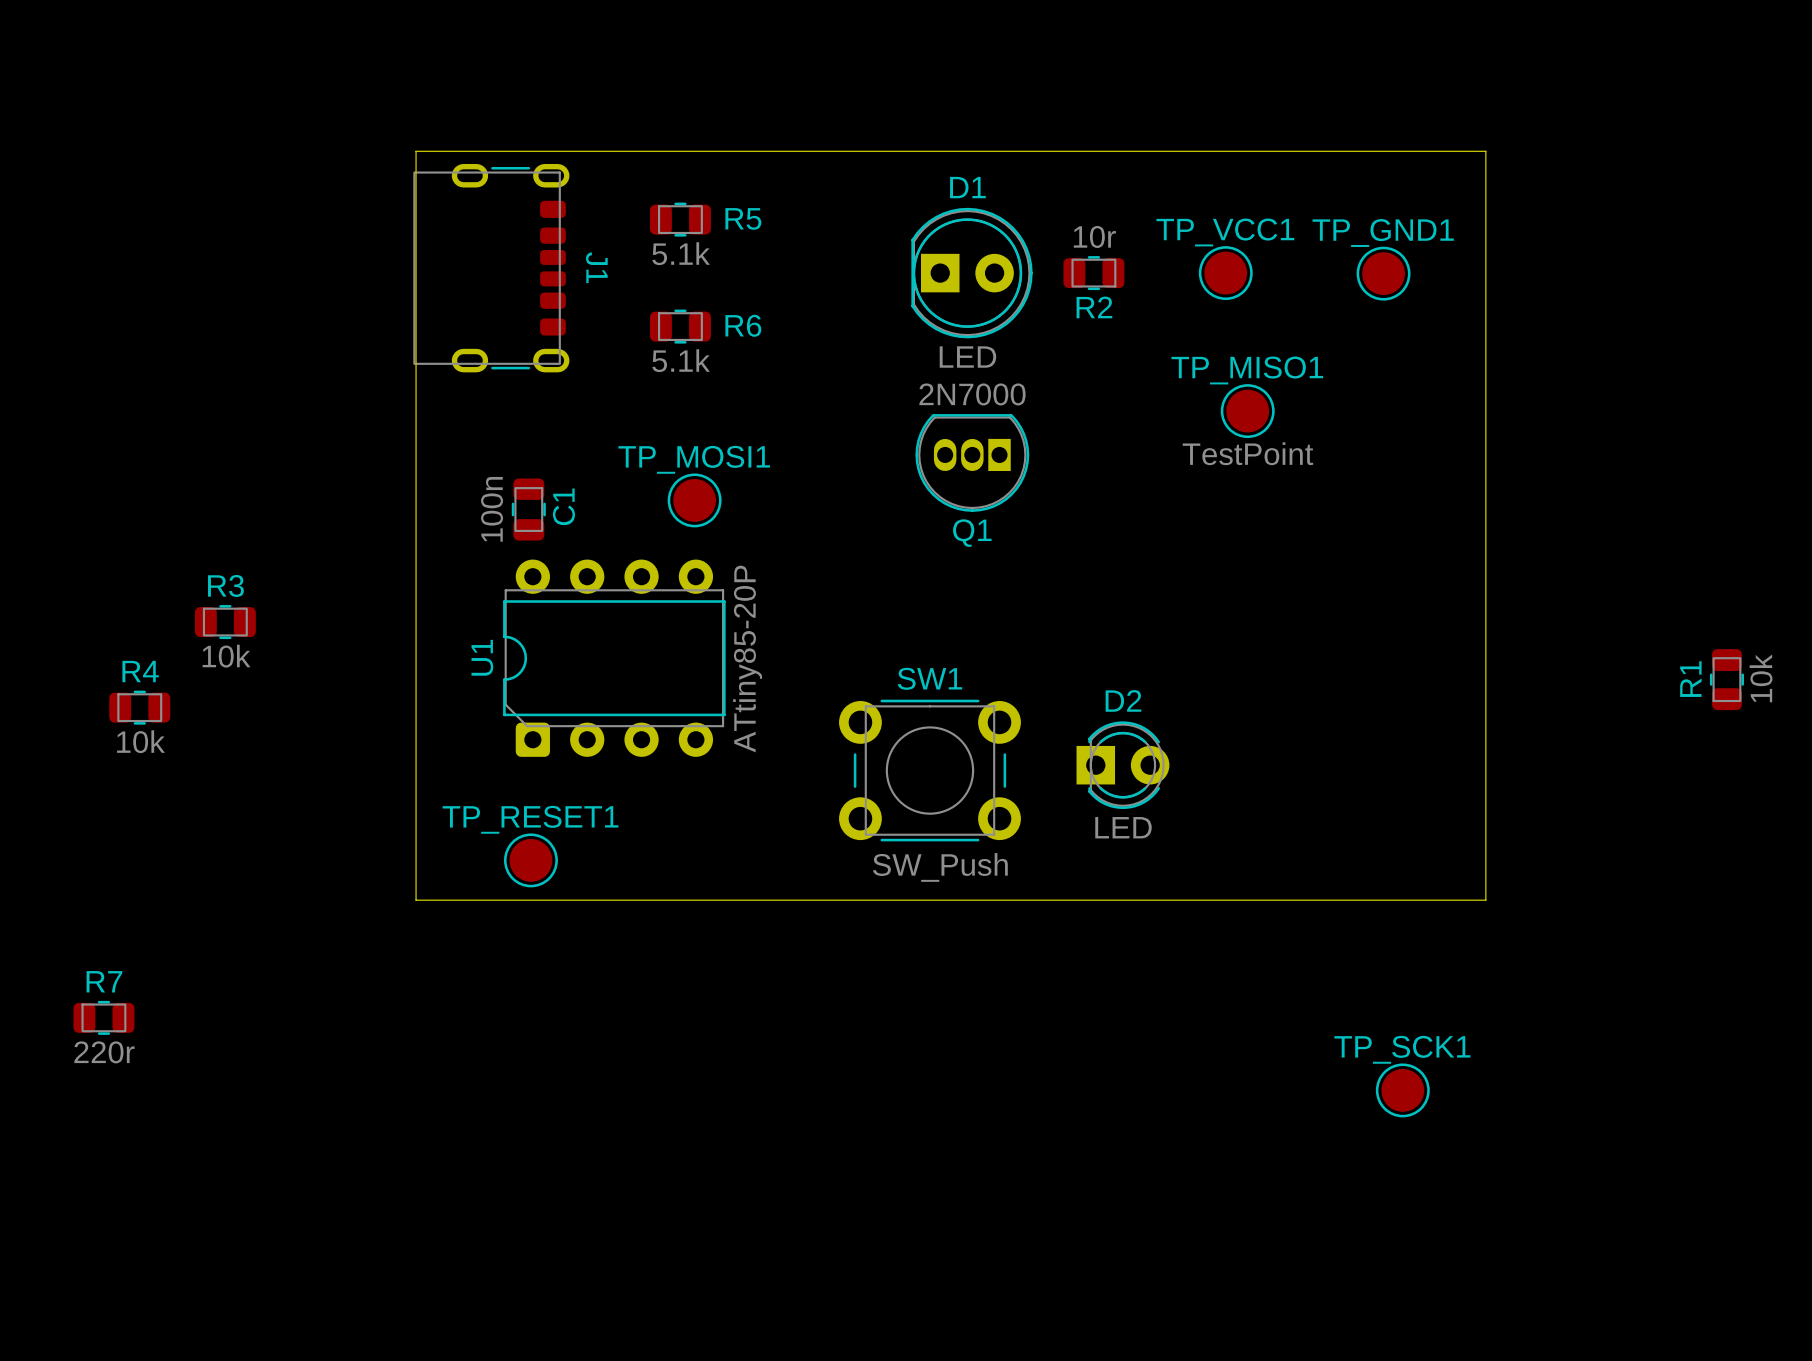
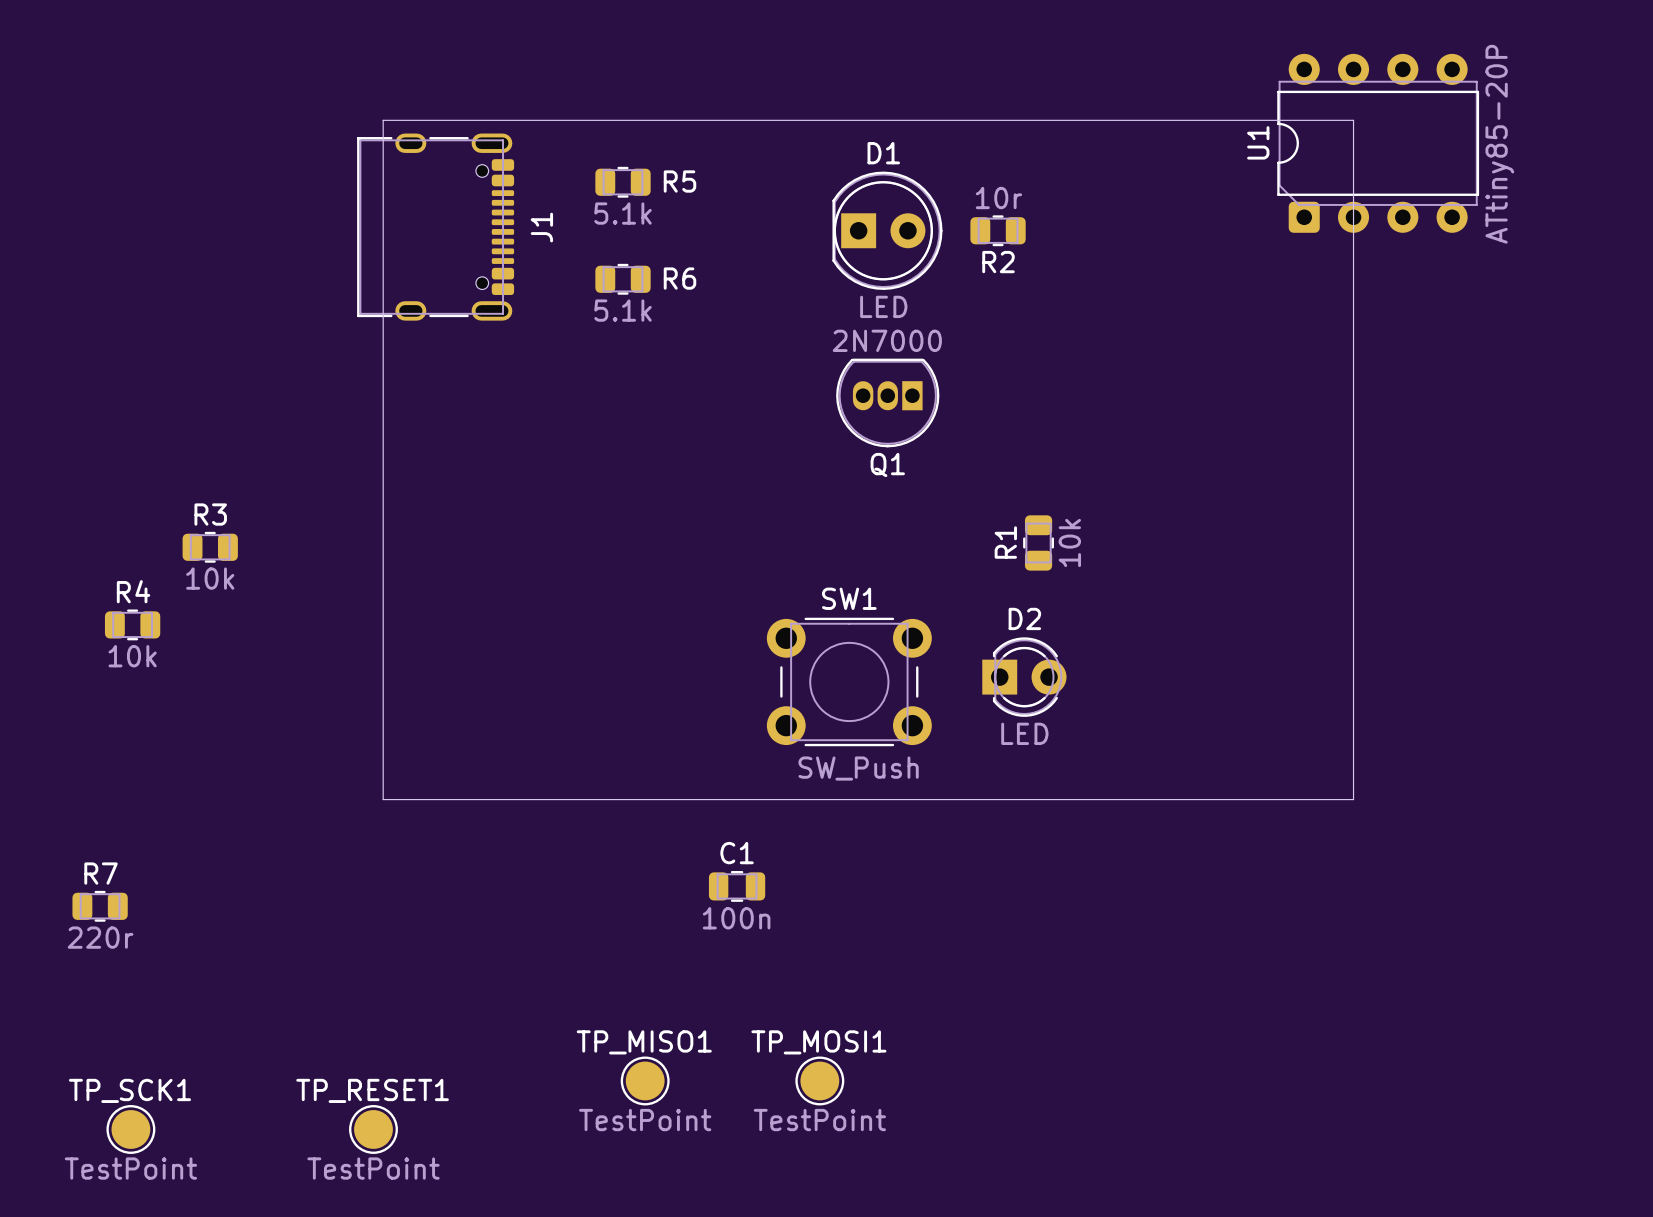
J1 footprint: [413, 163, 570, 373] -> [357, 133, 515, 321]
TP_VCC1: (1225, 273) -> none
TP_GND1: (1383, 273) -> none
TP_MISO1 position: (1247, 411) -> (645, 1080)
TP_MOSI1 position: (694, 500) -> (819, 1080)
C1 name position: C1 (563, 506) -> C1 (737, 853)
C1 value position: 100n (492, 509) -> 100n (736, 918)
C1 rotation: 0° (528, 509) -> 90° clockwise (737, 886)
C1 position: (528, 509) -> (737, 886)
U1 position: (614, 658) -> (1378, 143)
R1 position: (1726, 679) -> (1038, 542)
TP_RESET1 position: (530, 860) -> (373, 1129)
TP_SCK1 position: (1402, 1090) -> (130, 1129)
TP_MOSI1 value: none -> TestPoint (819, 1120)
TP_SCK1 value: none -> TestPoint (130, 1168)
TP_RESET1 value: none -> TestPoint (373, 1168)

